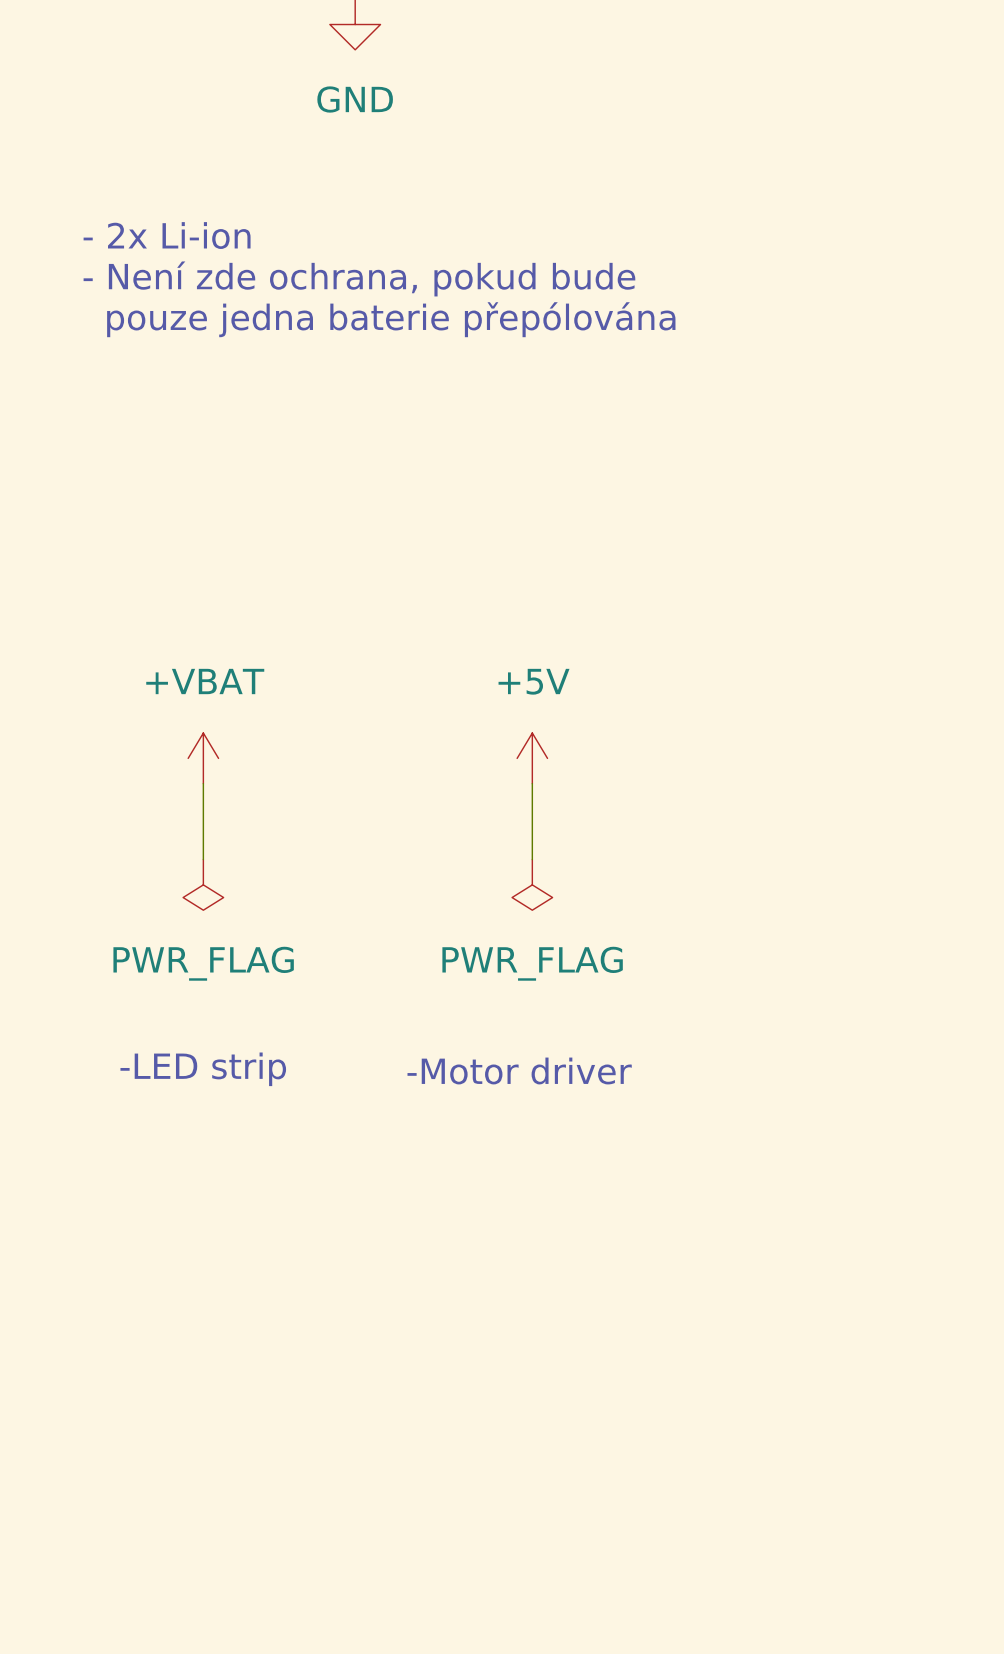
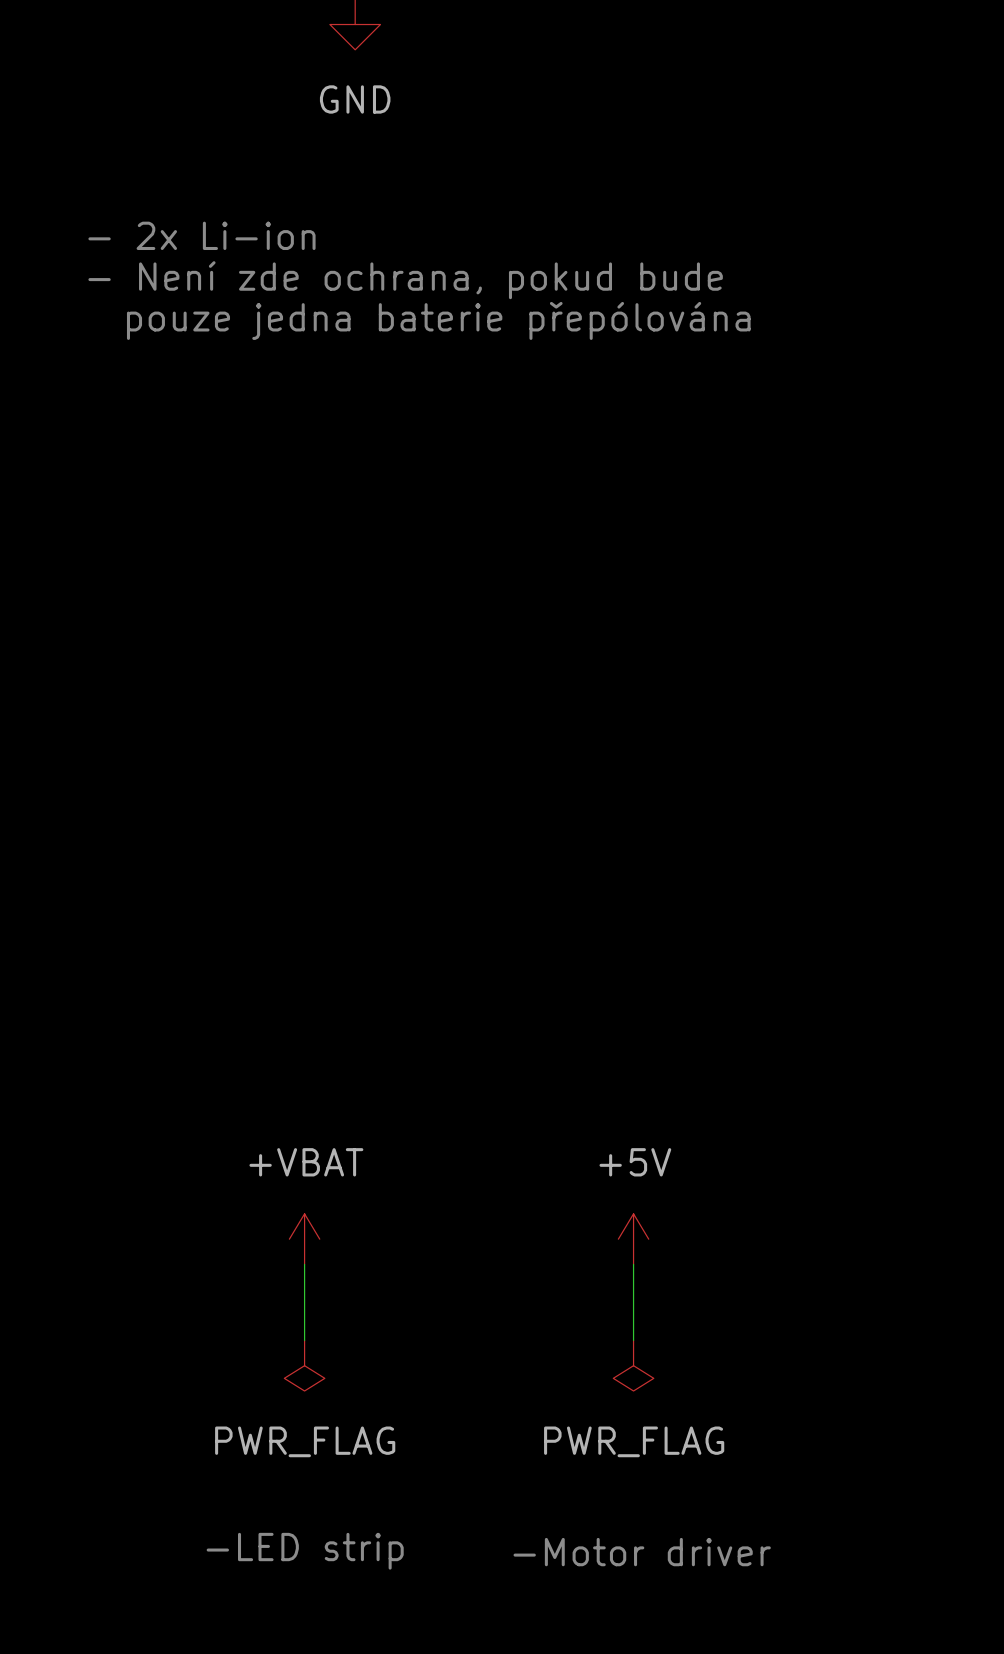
power symbol position: +VBAT (203, 758) -> +VBAT (304, 1239)
power symbol position: +5V (532, 758) -> +5V (633, 1239)
wire: (203, 783) (203, 859) -> (304, 1264) (304, 1340)
wire: (532, 783) (532, 859) -> (633, 1264) (633, 1340)
power symbol: PWR_FLAG (203, 884) -> none
power symbol: PWR_FLAG (532, 884) -> none
text position: -LED strip (203, 1069) -> -LED strip (305, 1551)
text position: -Motor driver (519, 1071) -> -Motor driver (642, 1552)
power symbol: none -> PWR_FLAG (304, 1365)
power symbol: none -> PWR_FLAG (633, 1365)

